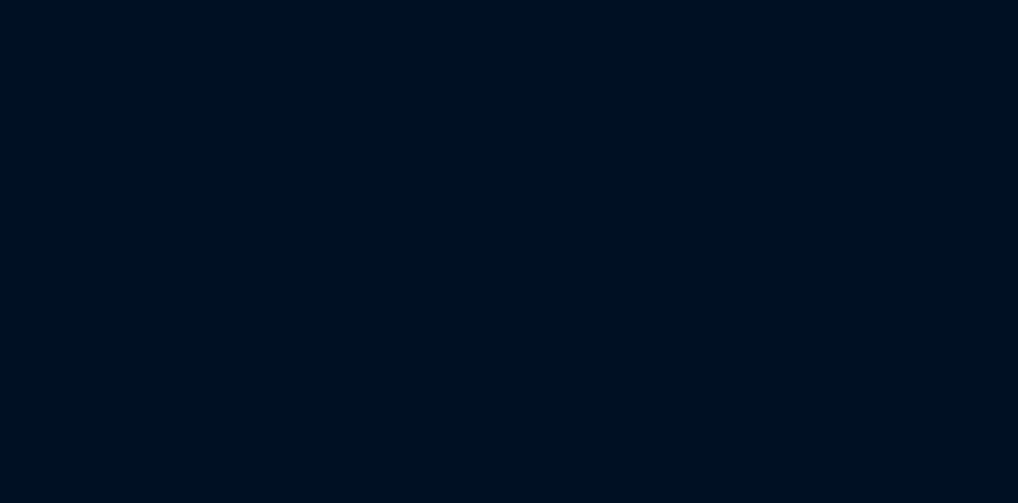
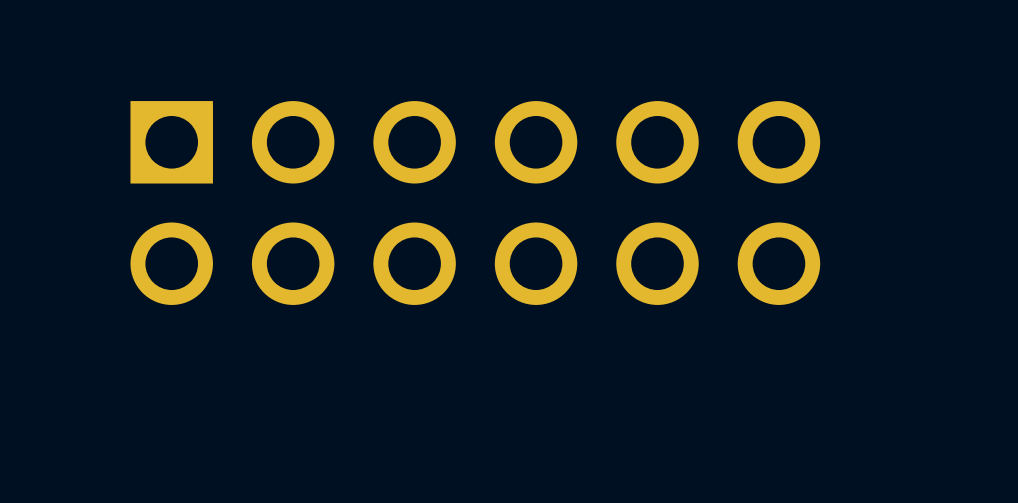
part: none -> (475, 203)

